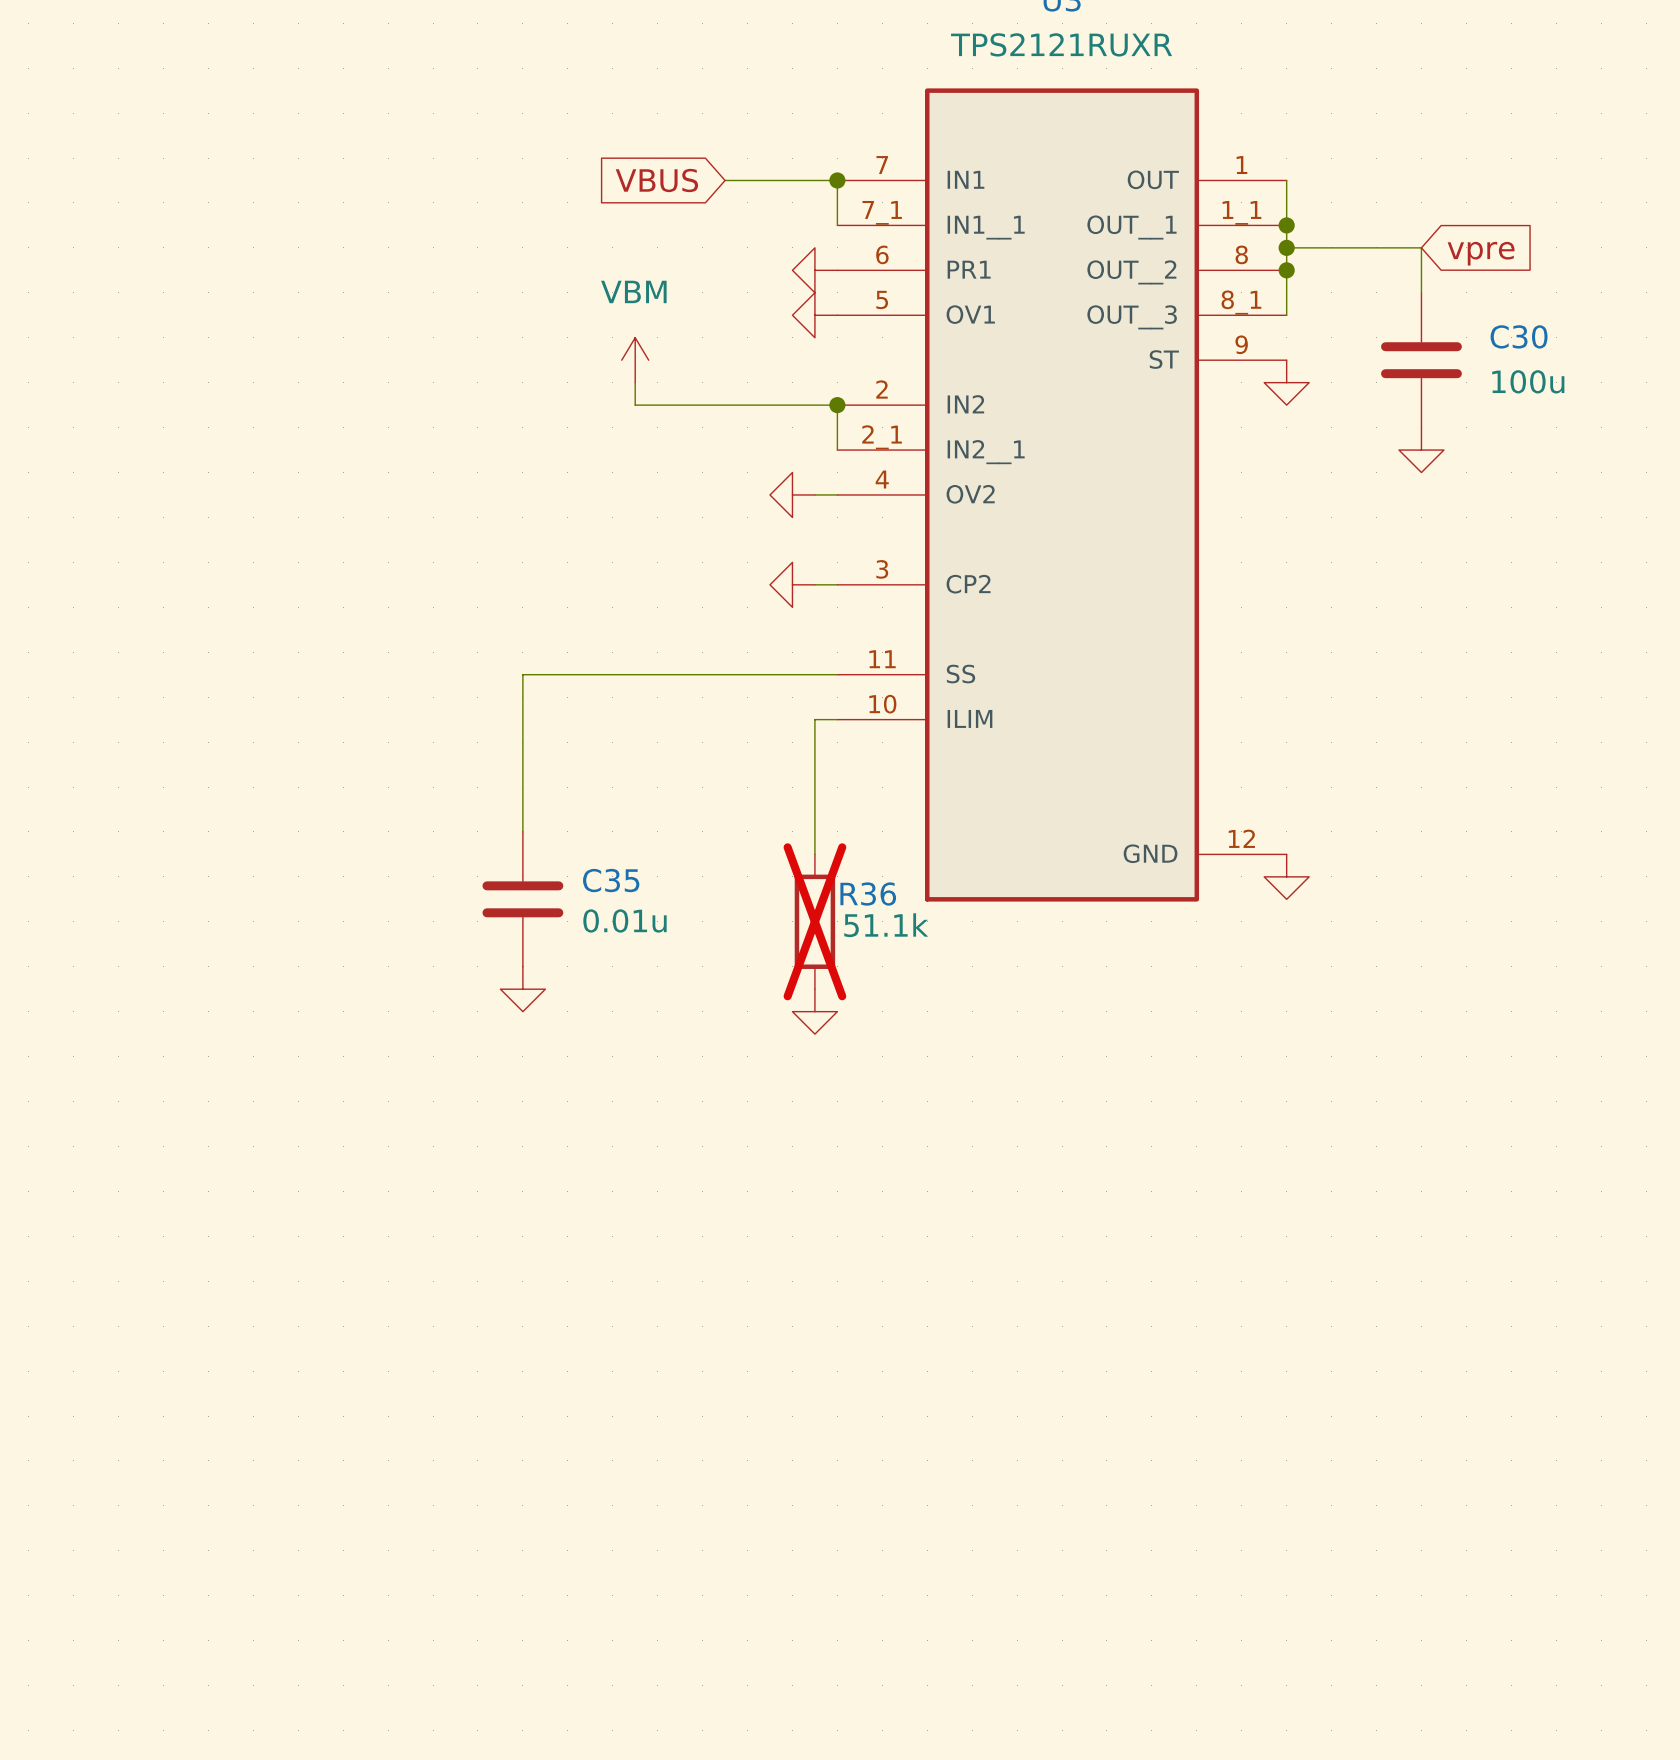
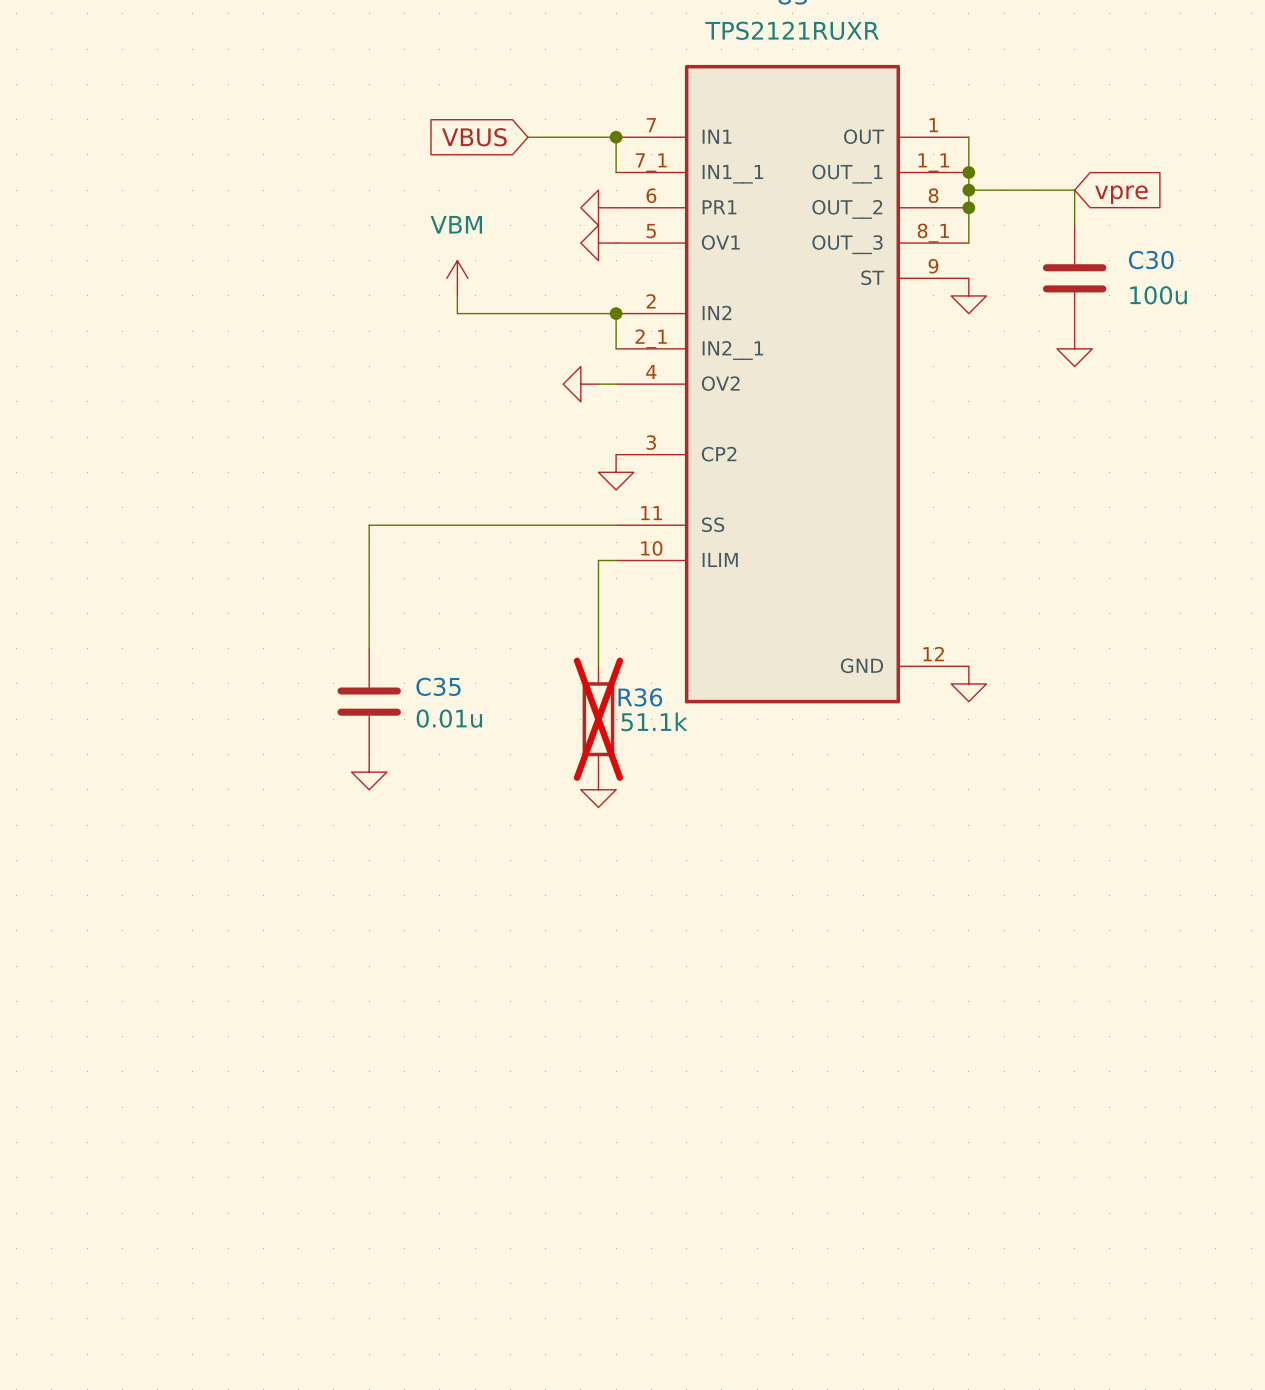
power symbol rotation: 0° (792, 584) -> 90° counterclockwise (616, 472)
power symbol position: (792, 584) -> (616, 472)
wire: (814, 584) (837, 584) -> none

